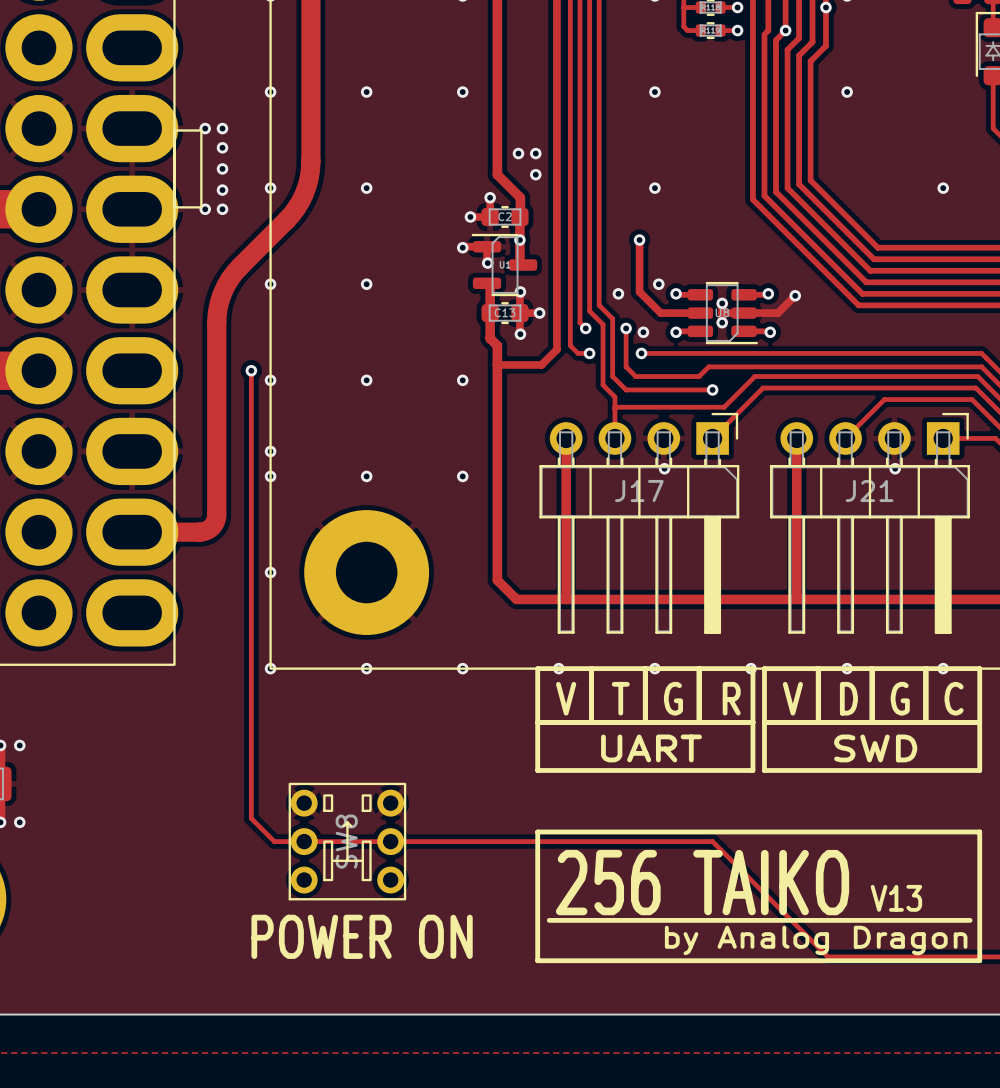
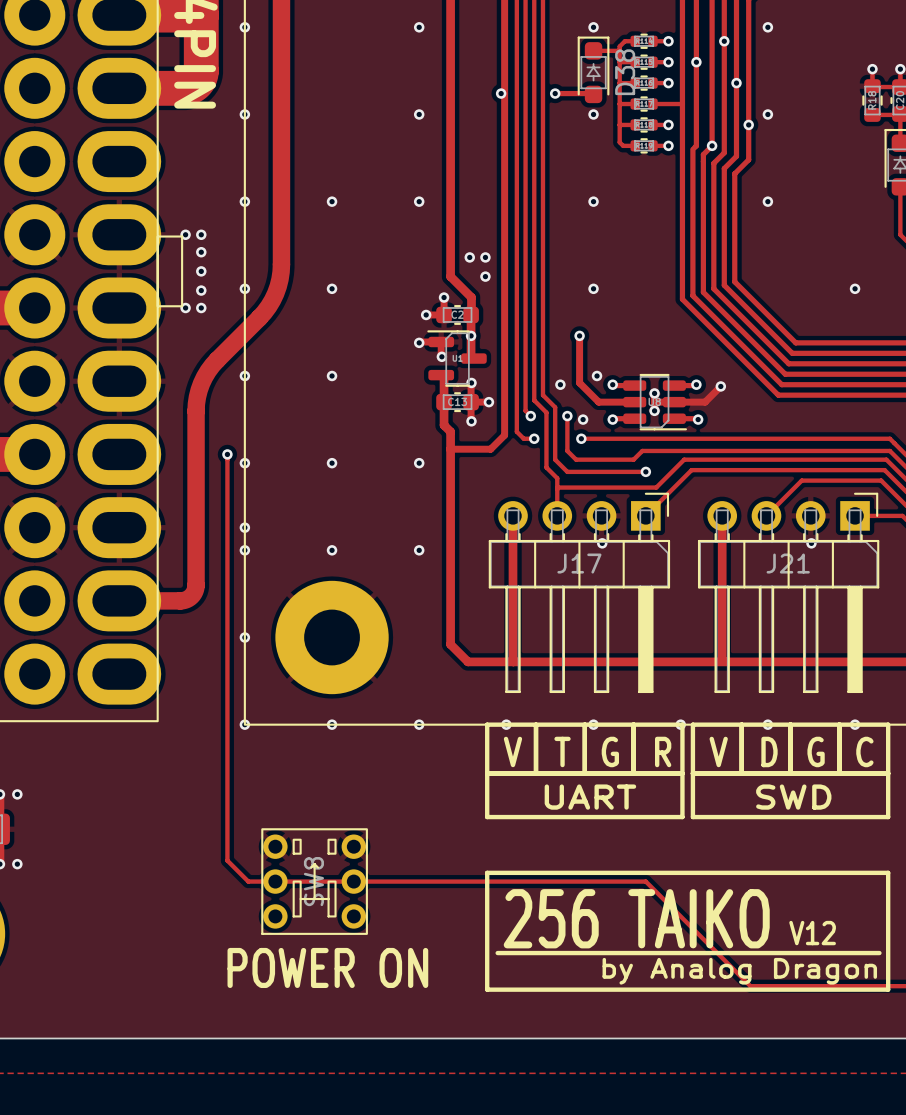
text: V13 (896, 898) -> V12 (812, 933)

